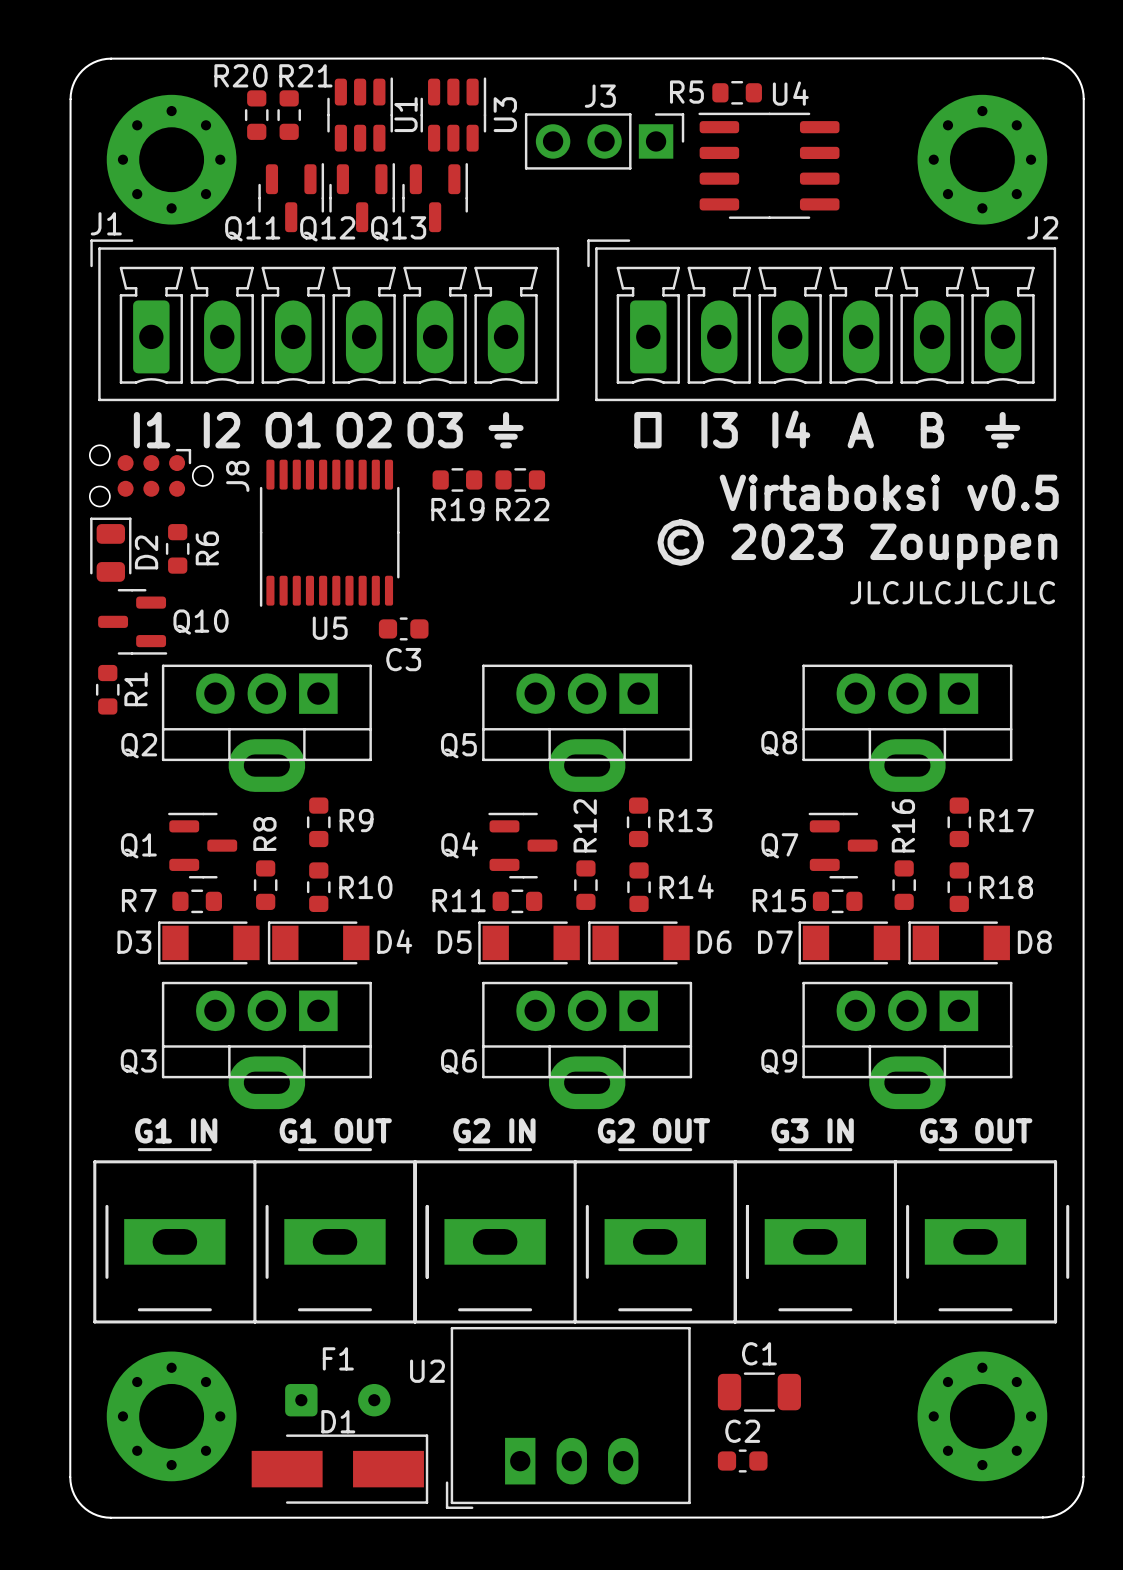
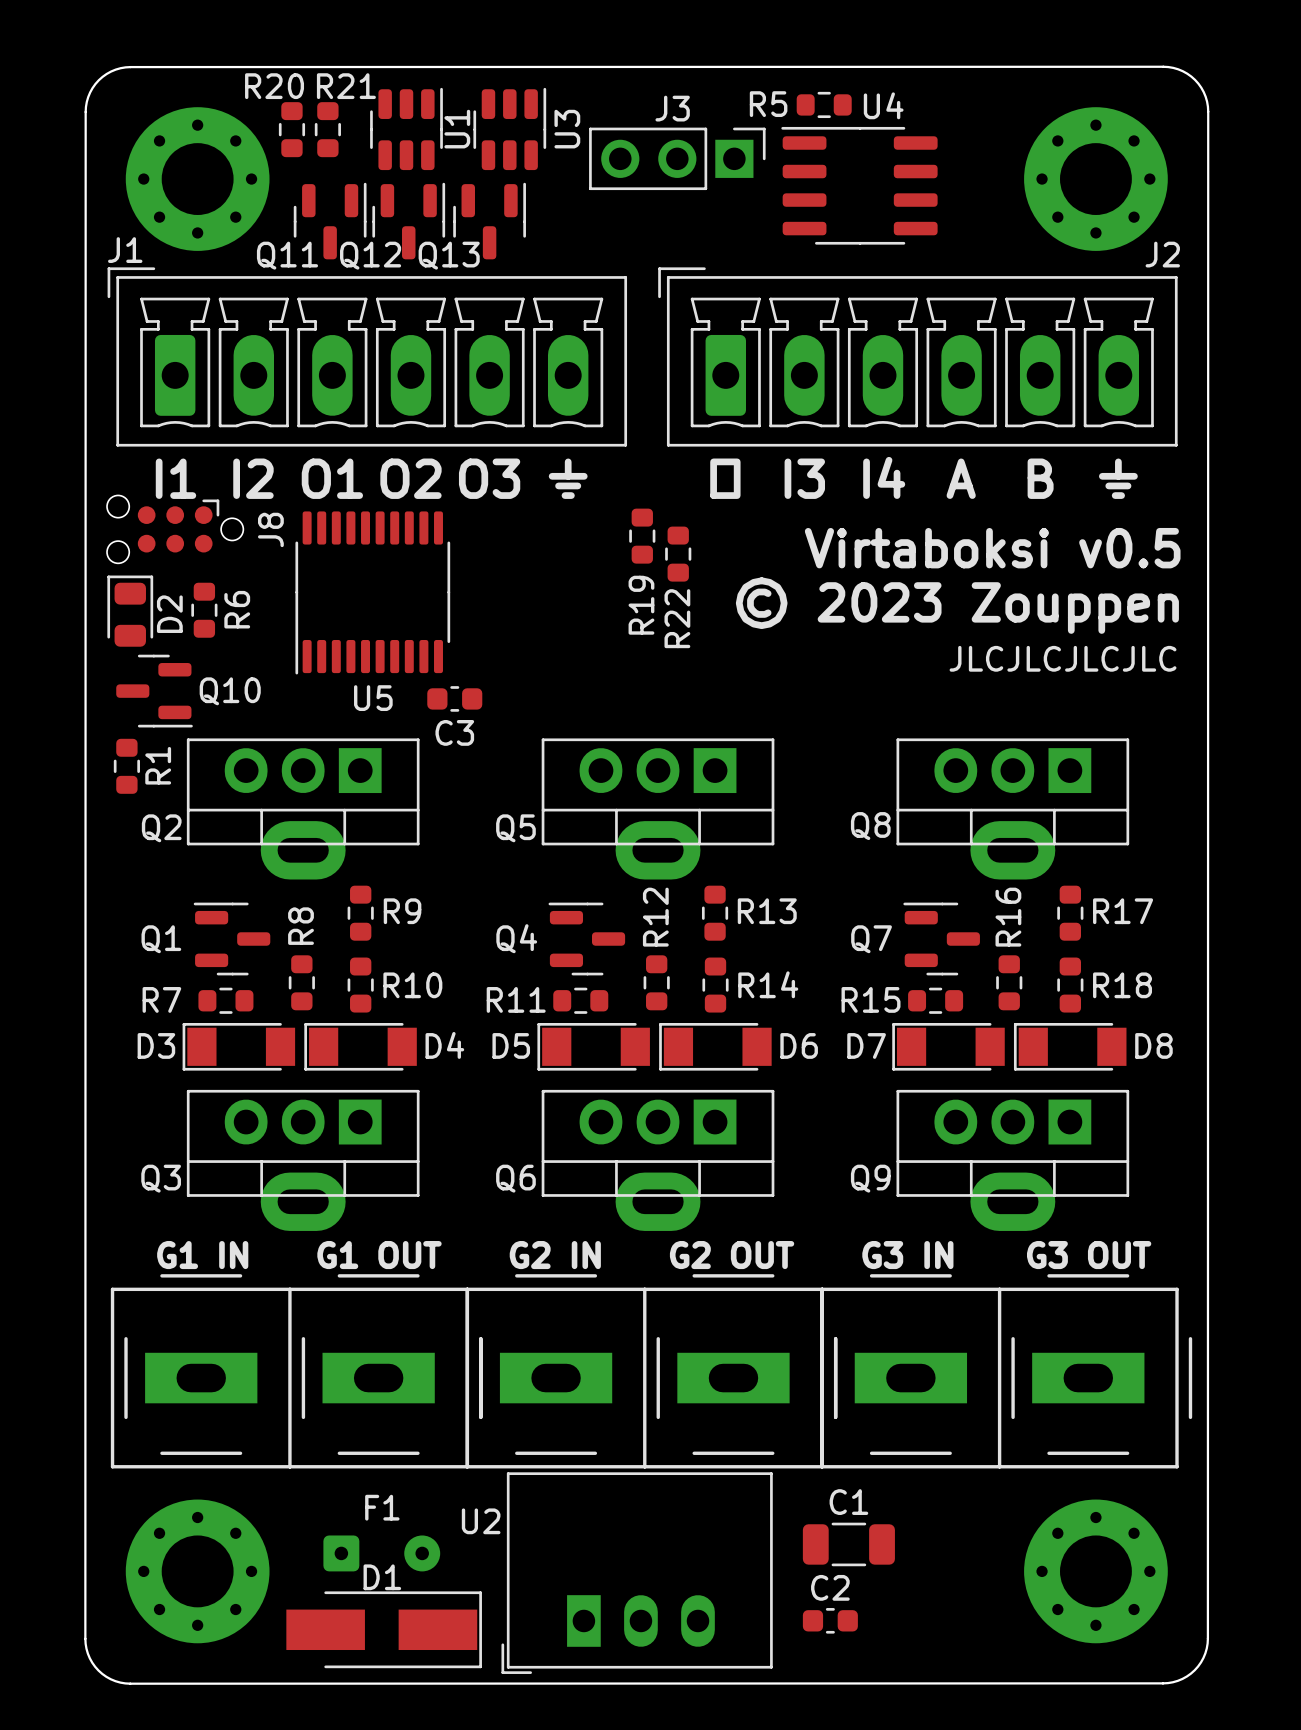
R19 rotation: 0° (457, 479) -> 90° clockwise (642, 536)
R19 position: (457, 479) -> (642, 536)
R22 rotation: 0° (520, 479) -> 90° clockwise (678, 554)
R22 position: (520, 479) -> (678, 554)

